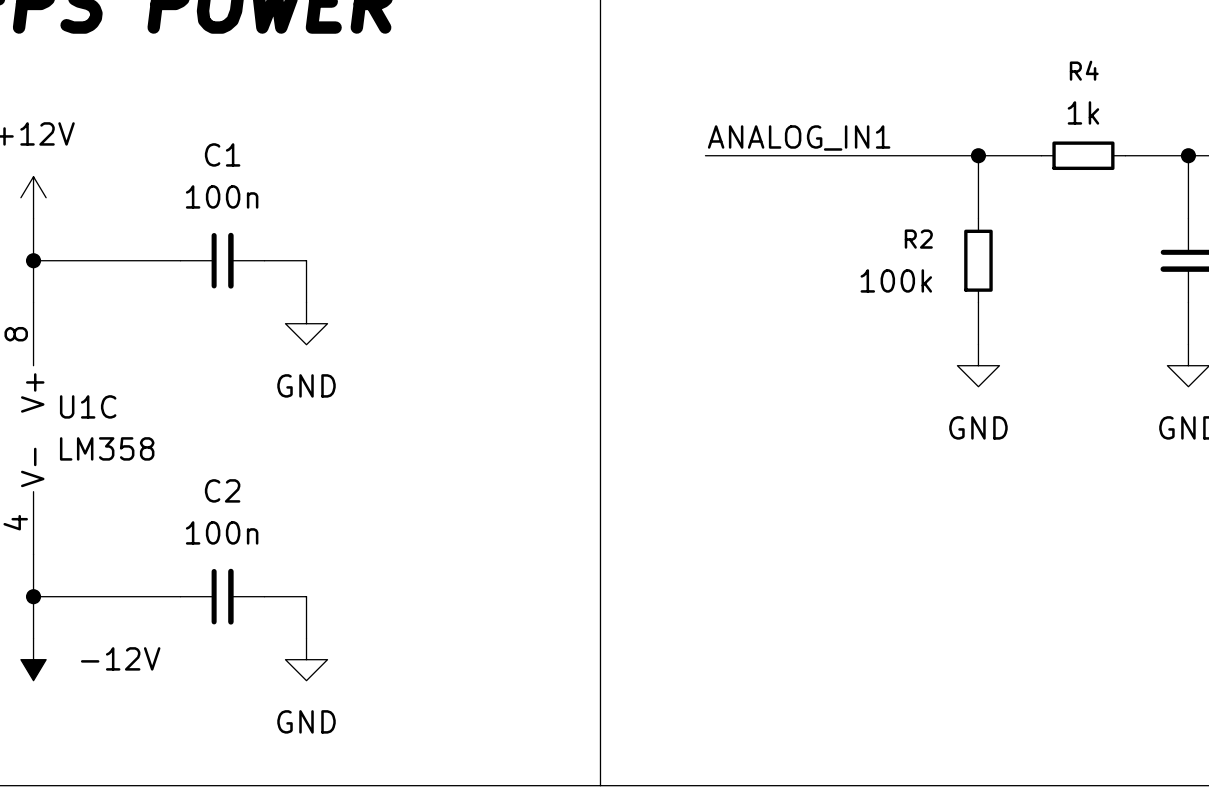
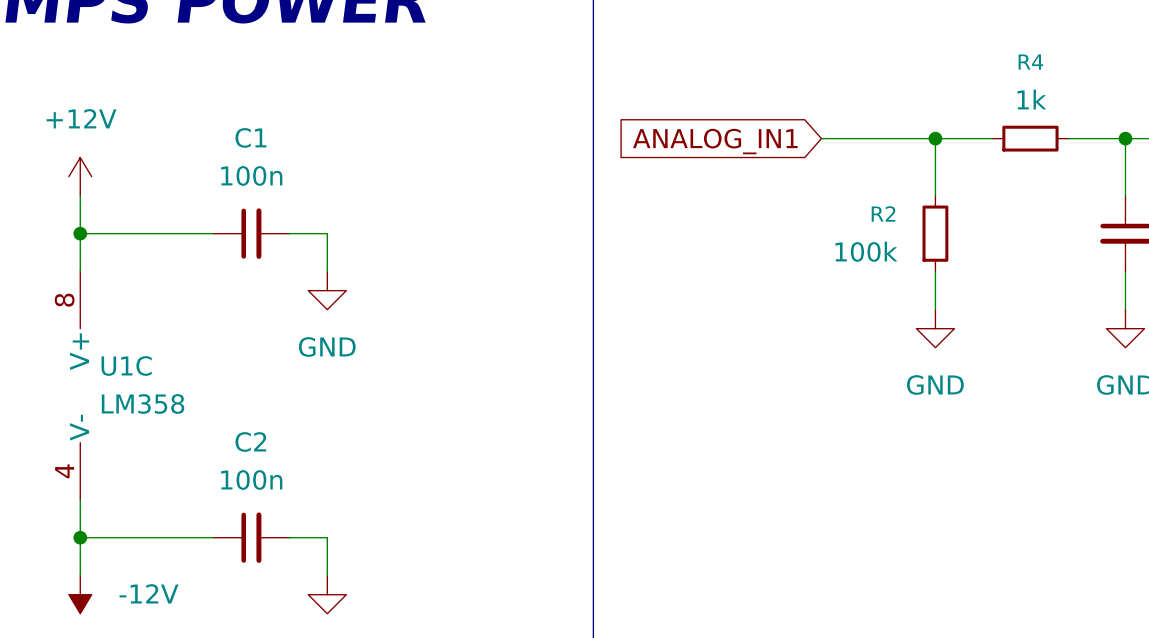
label: ANALOG_IN1 (799, 137) -> none
wire: (705, 155) (852, 155) -> none
global label: none -> ANALOG_IN1 (715, 141)

